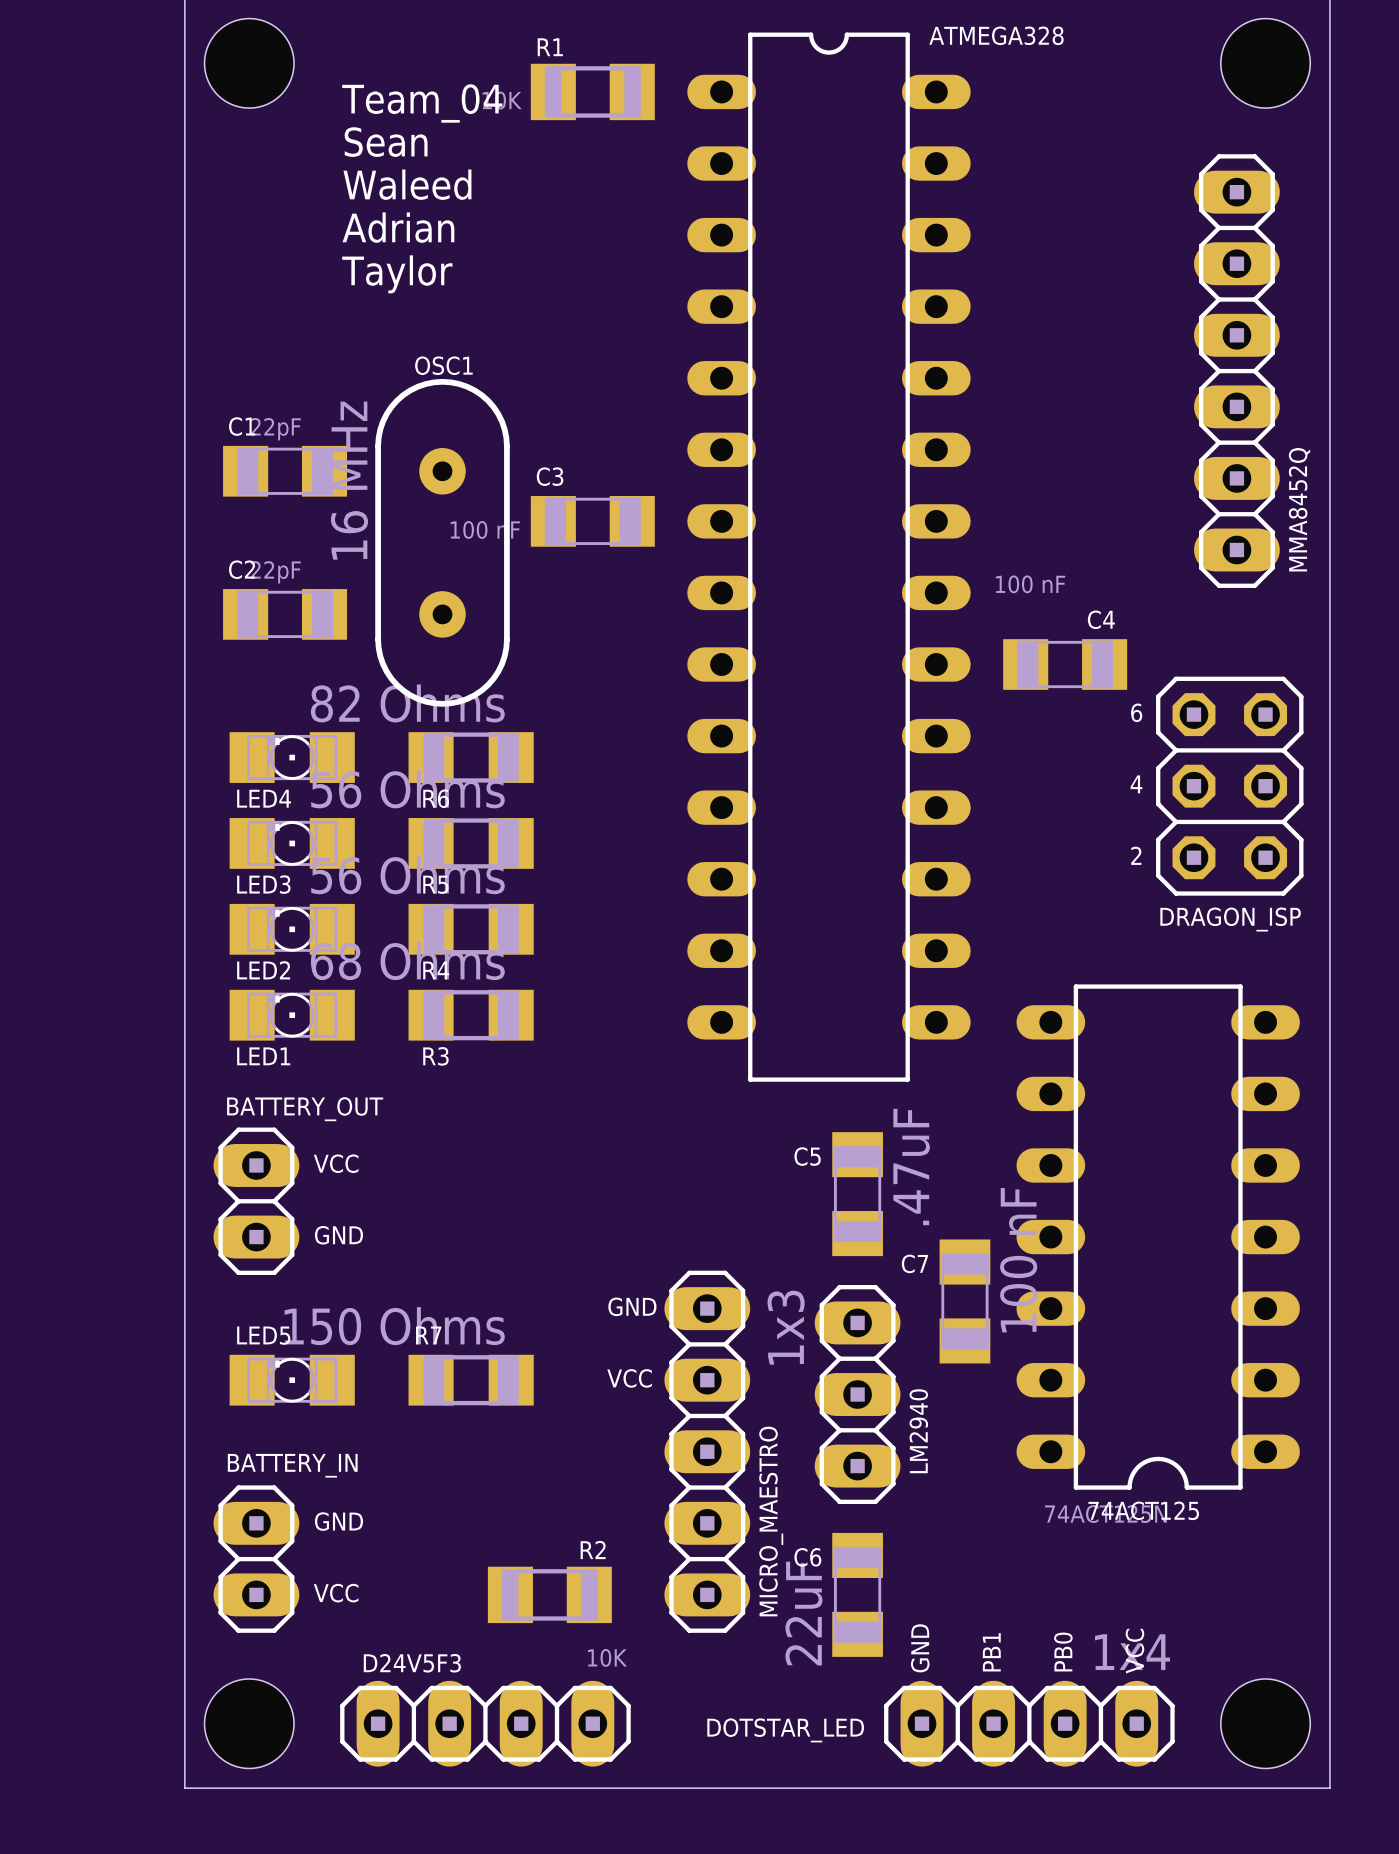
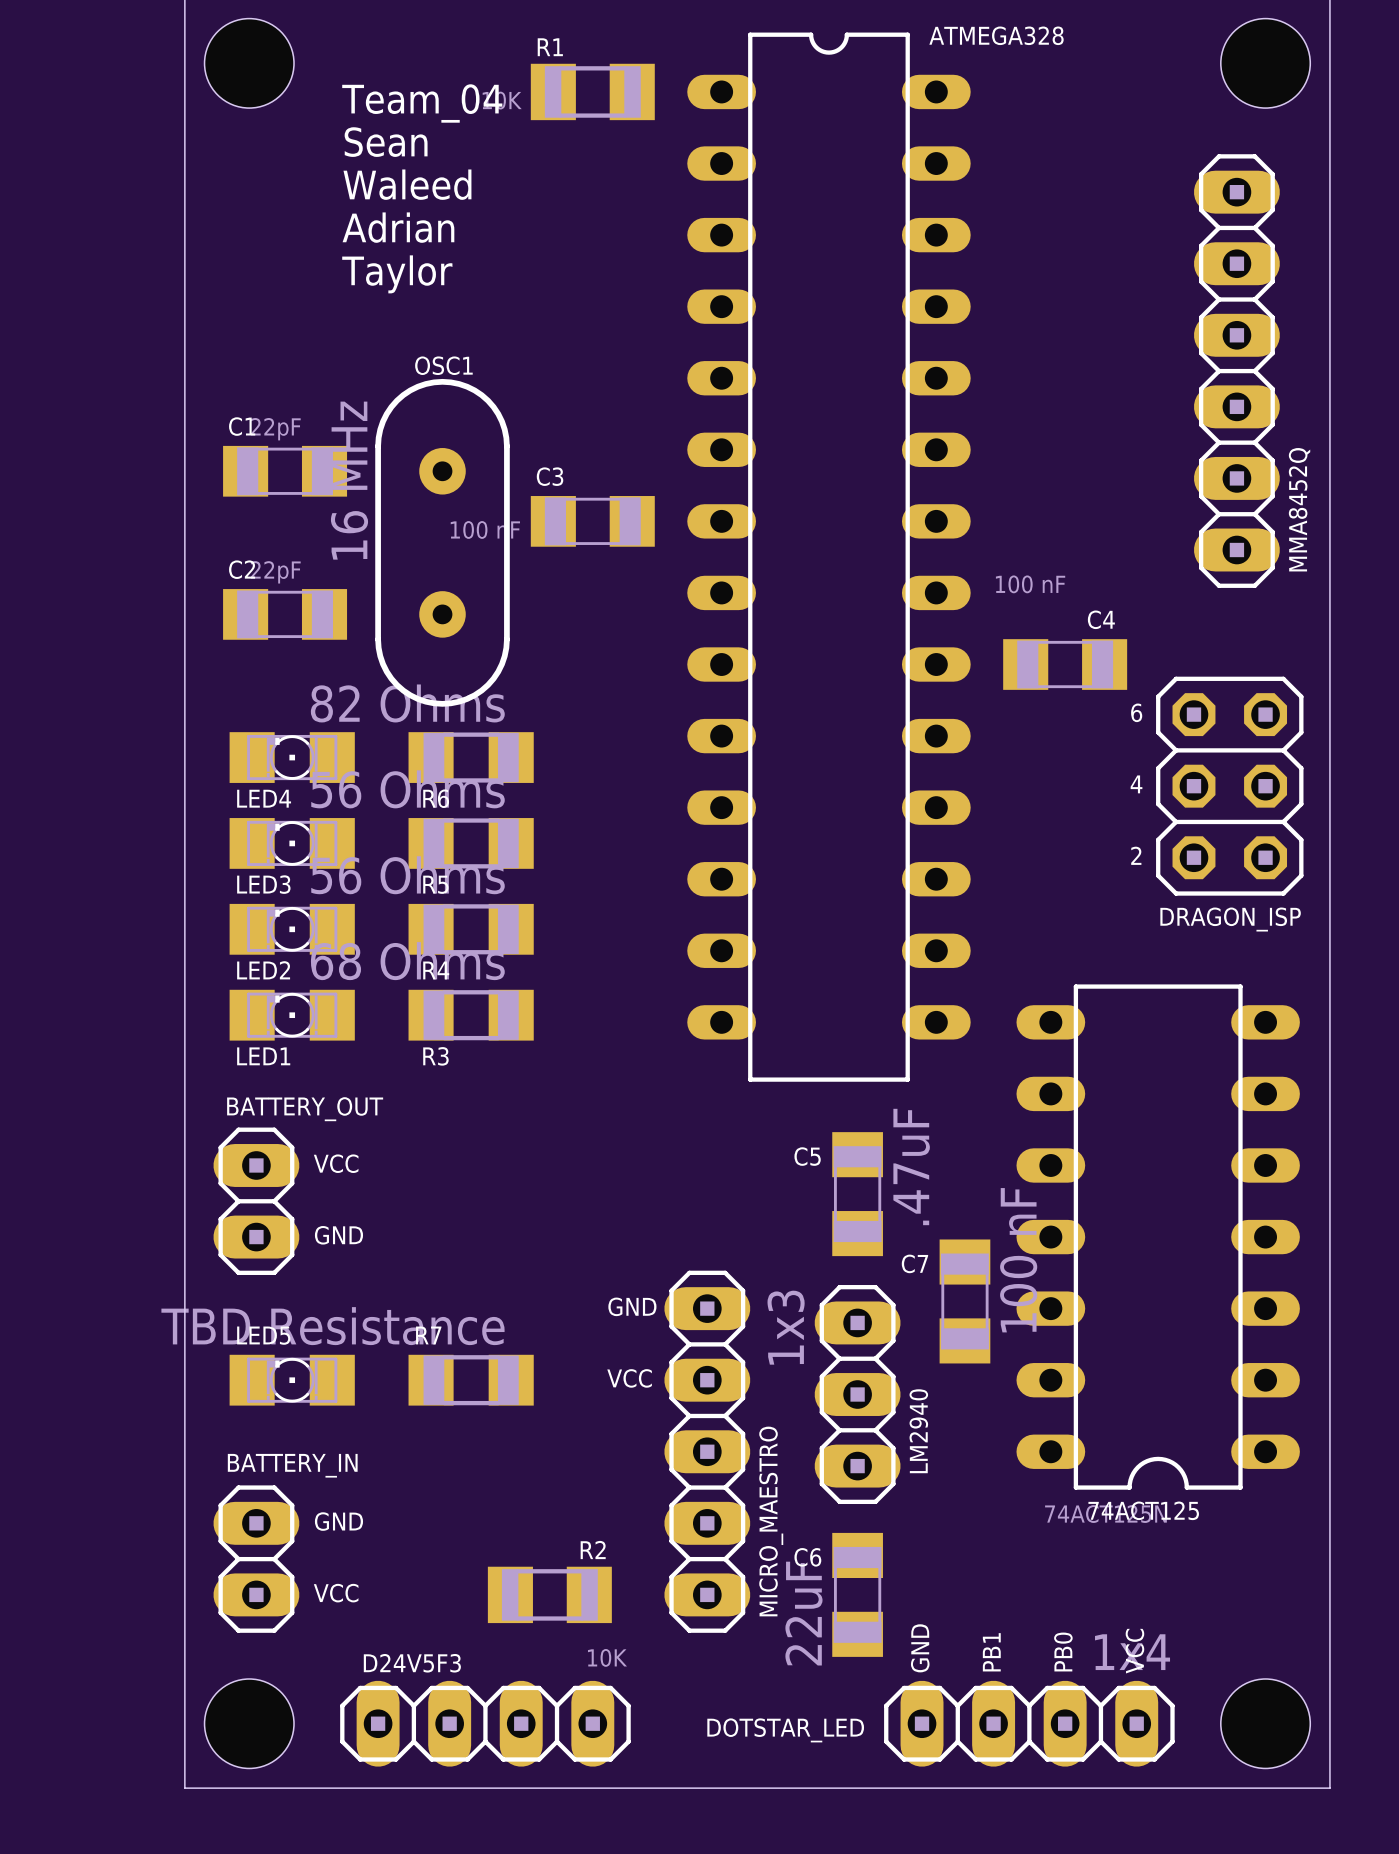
R7 value: 150 Ohms (394, 1326) -> TBD Resistance (332, 1326)

